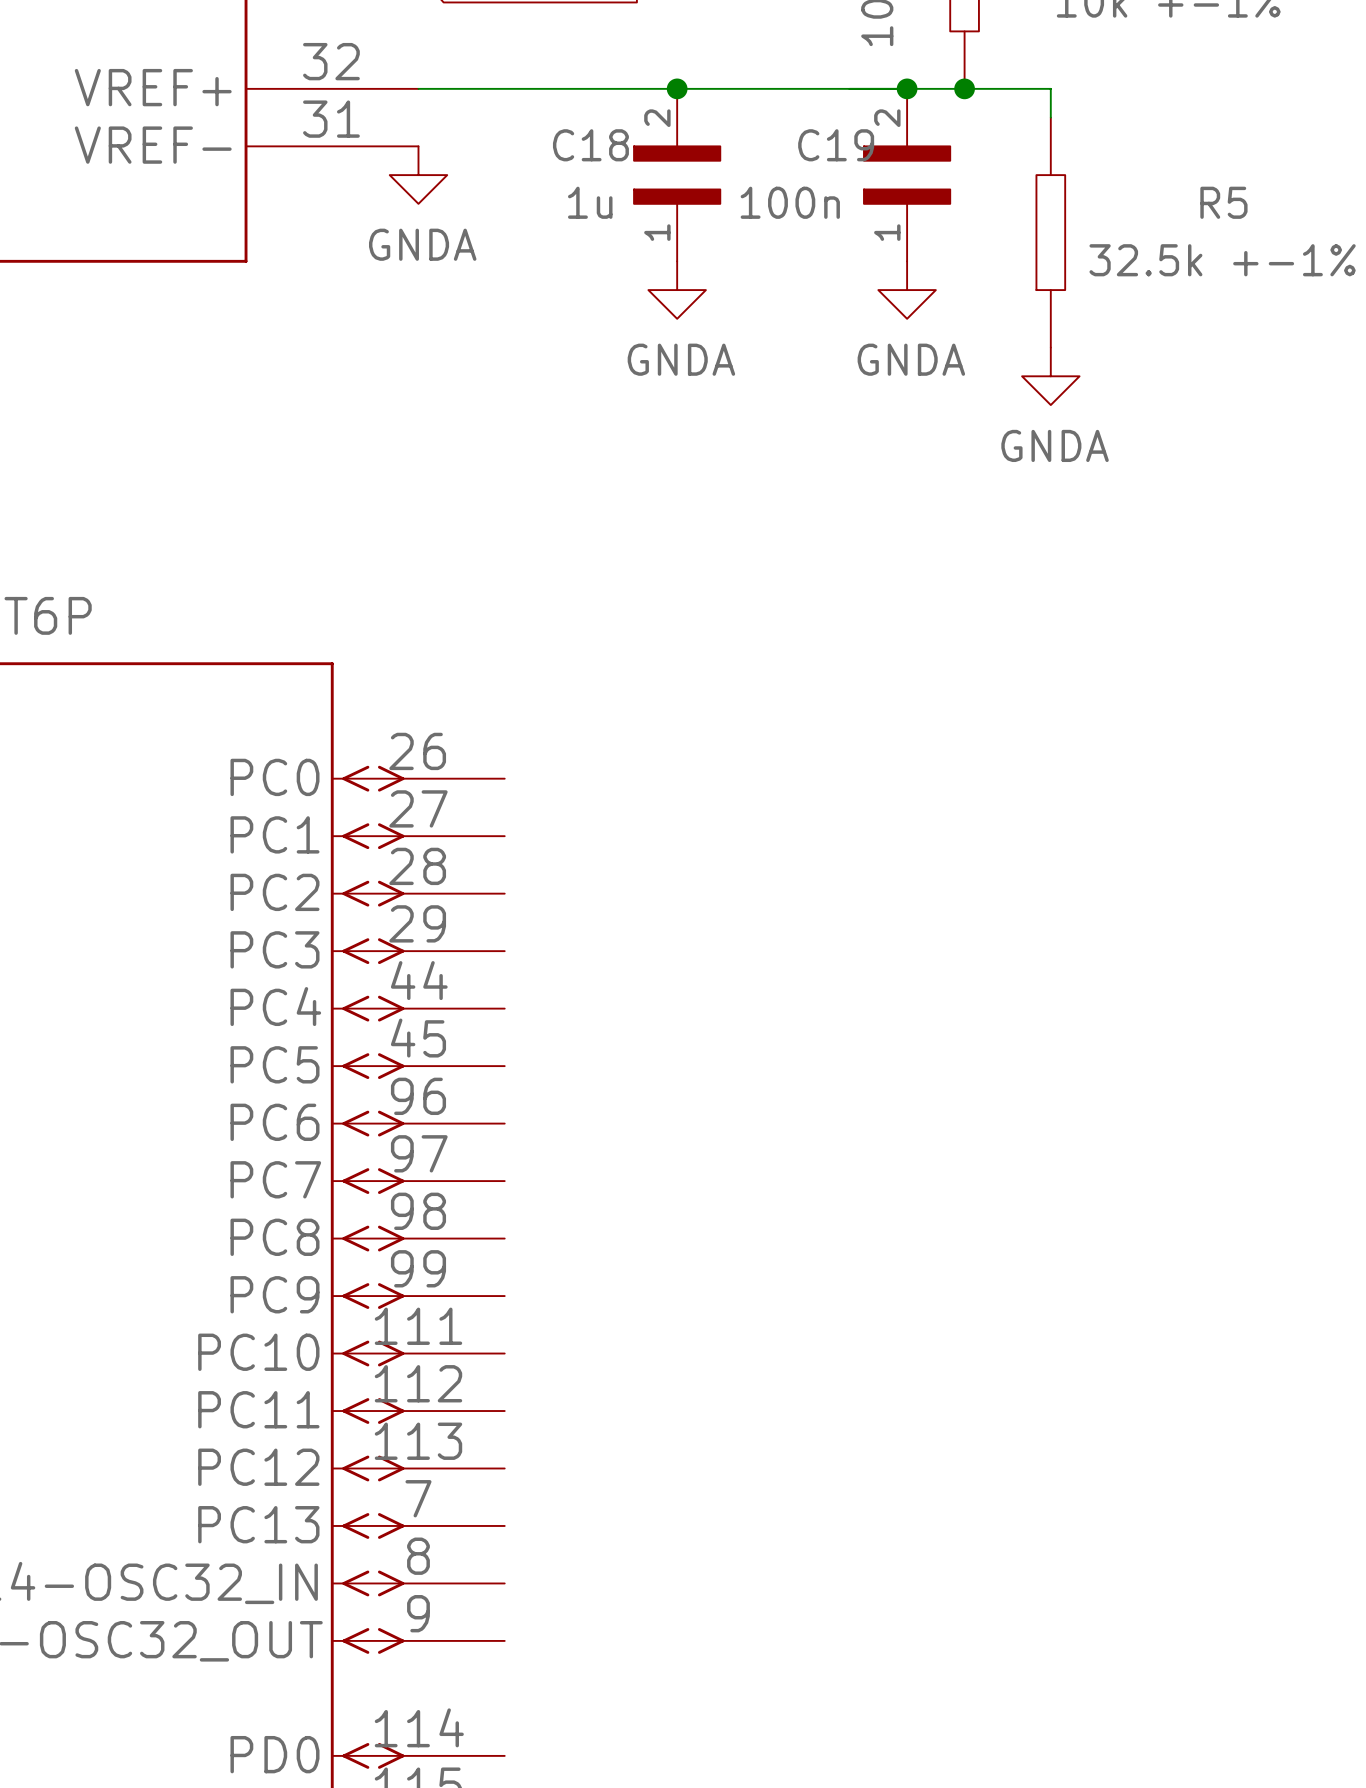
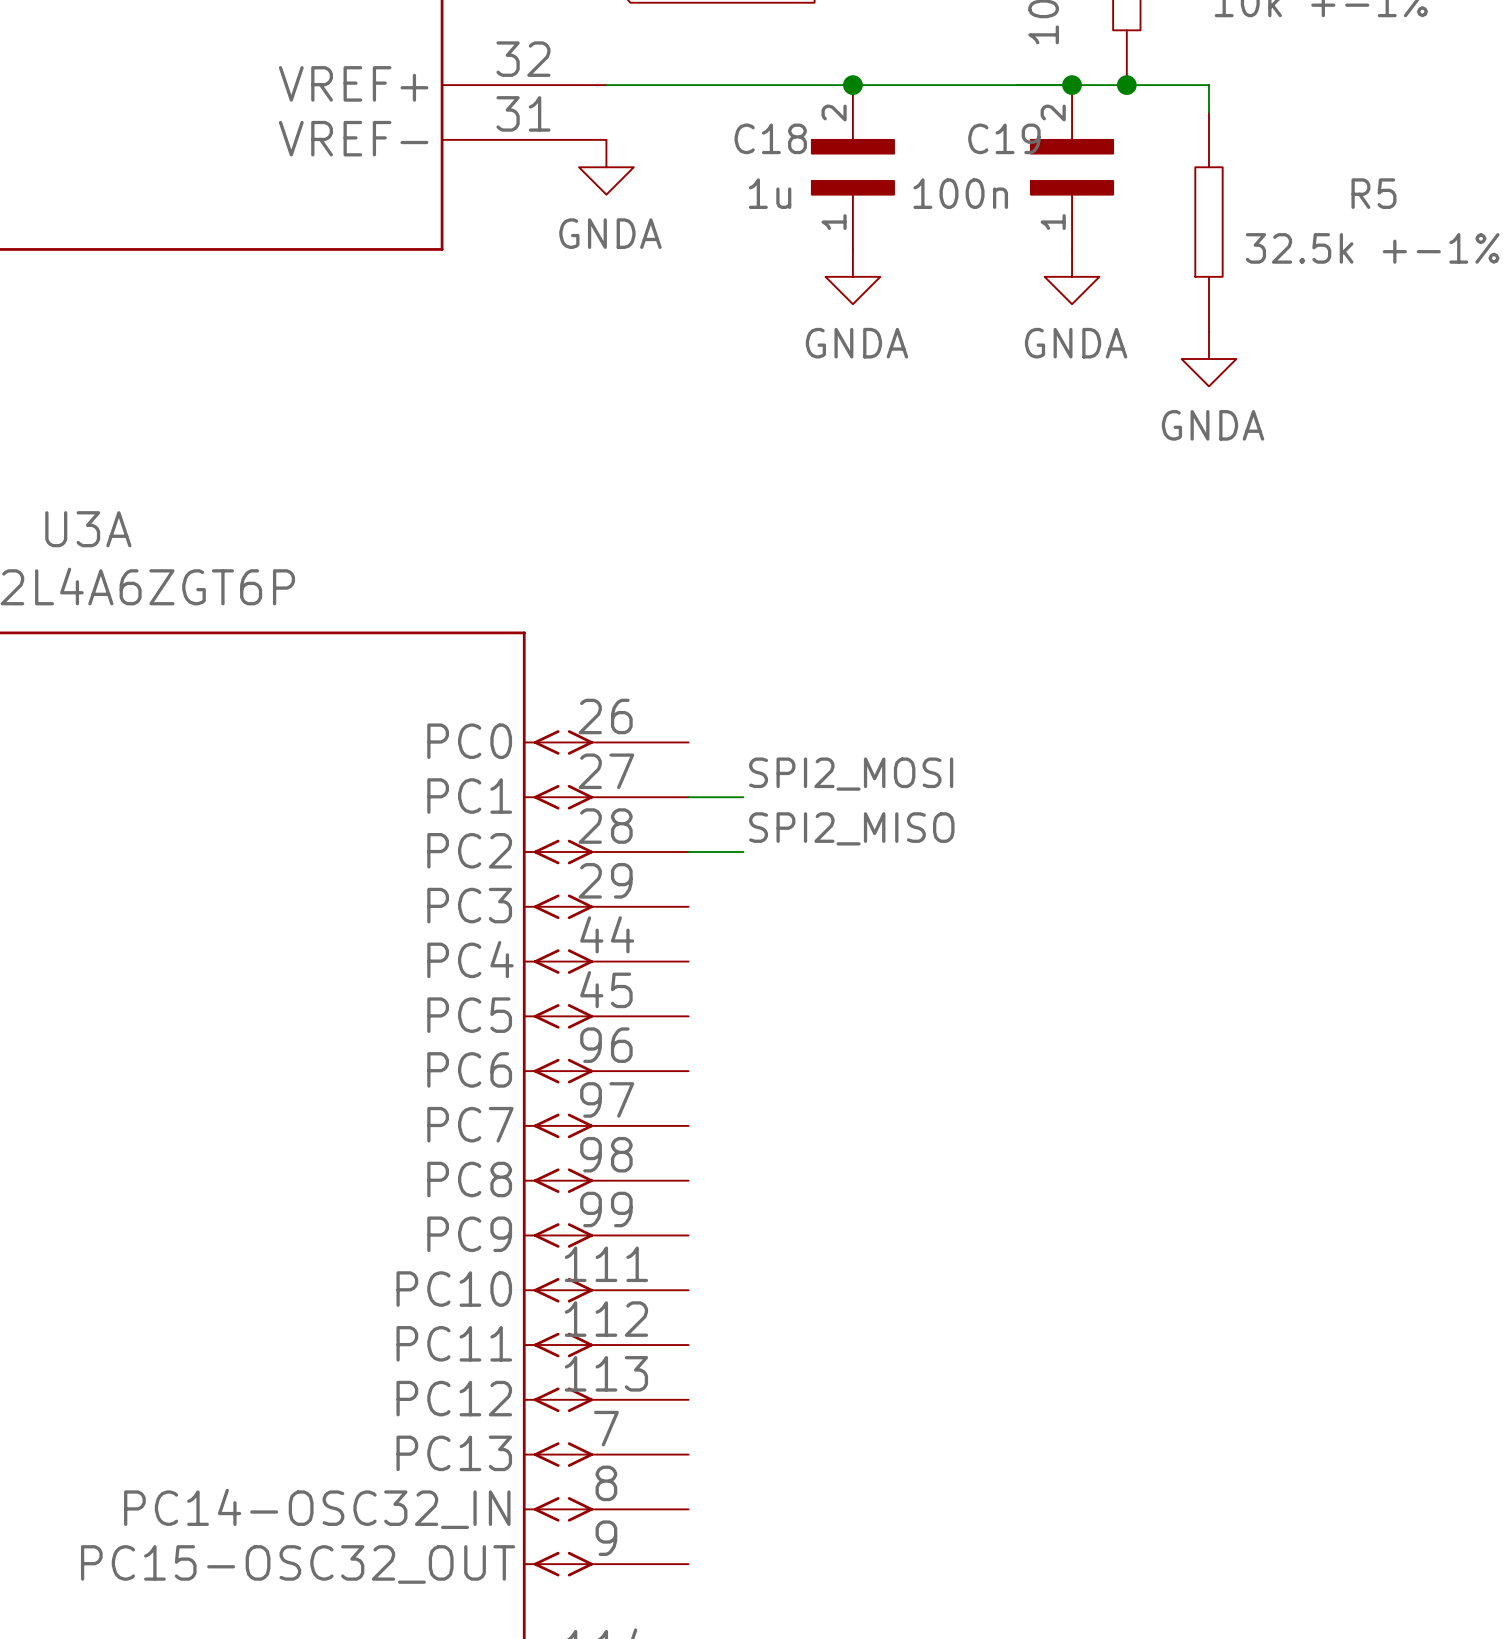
label: none -> SPI2_MOSI (851, 774)
wire: none -> (688, 797) (743, 797)
label: none -> SPI2_MISO (851, 828)
wire: none -> (688, 852) (743, 852)

